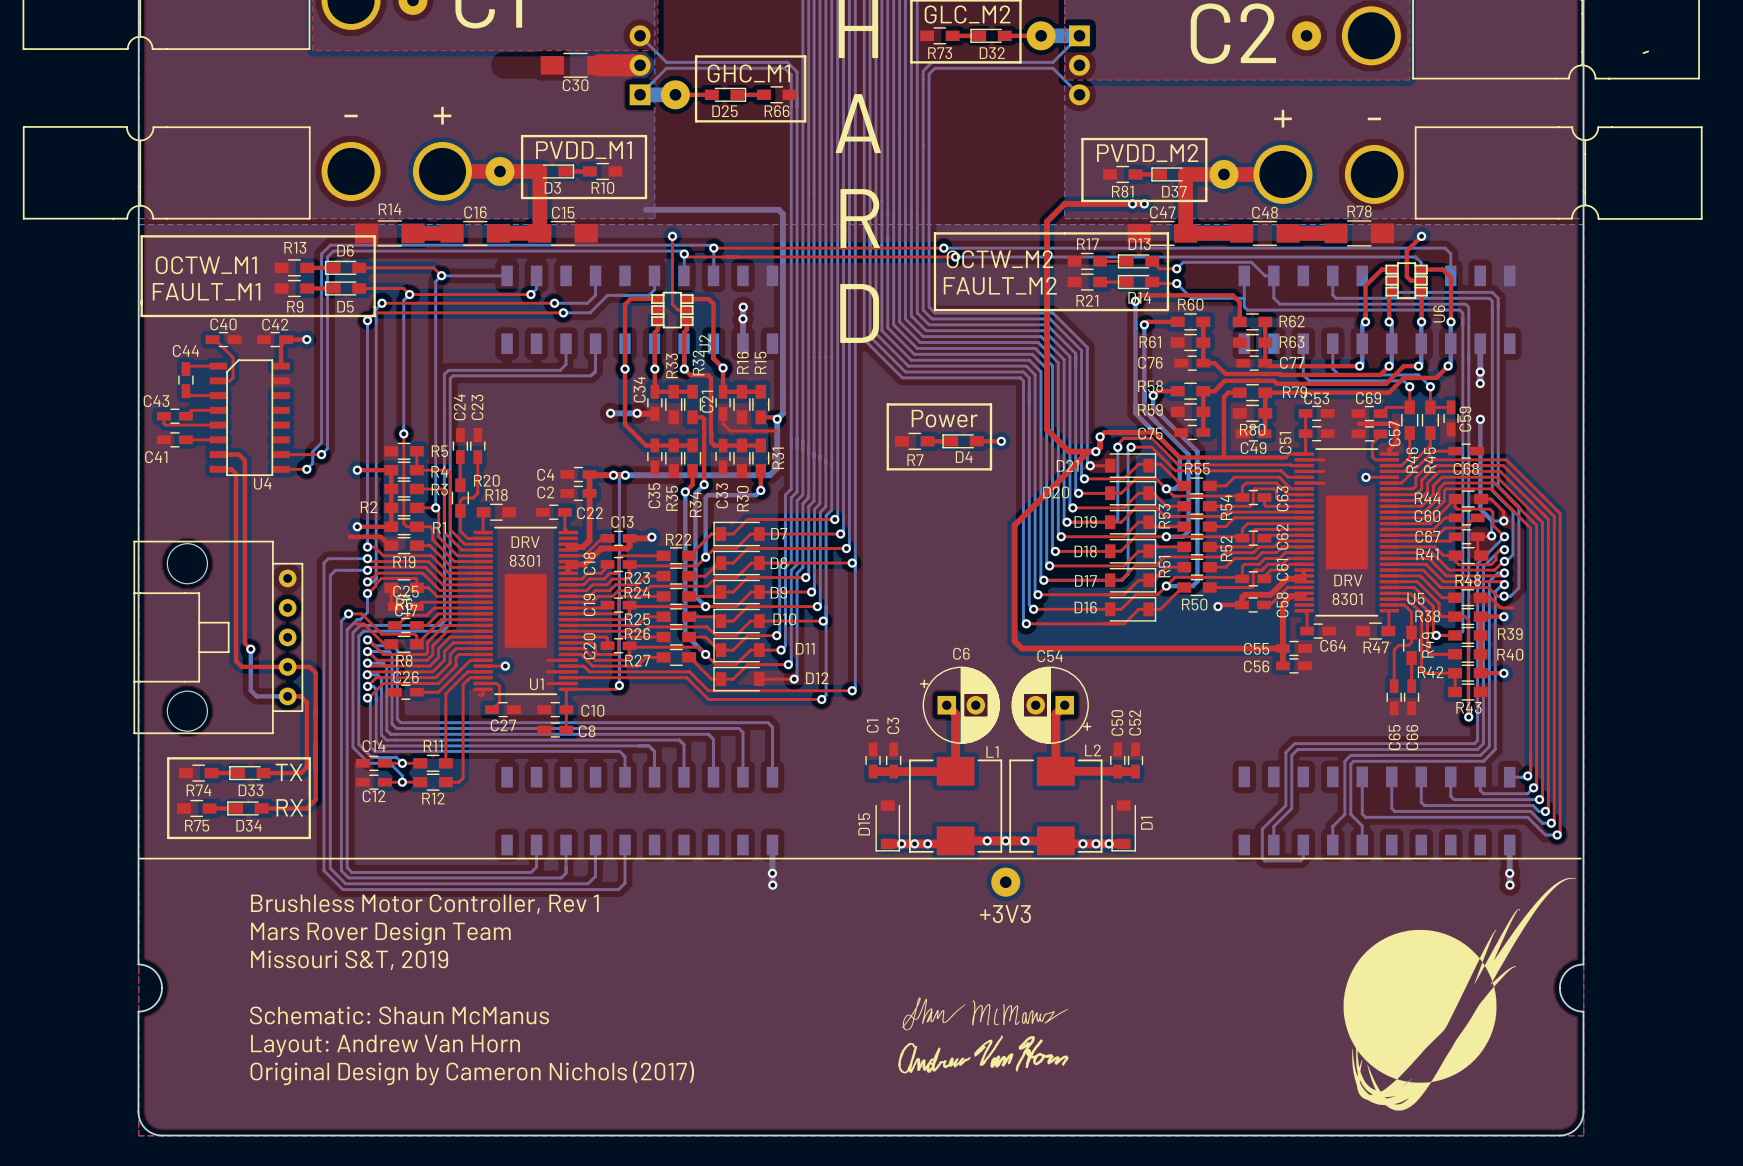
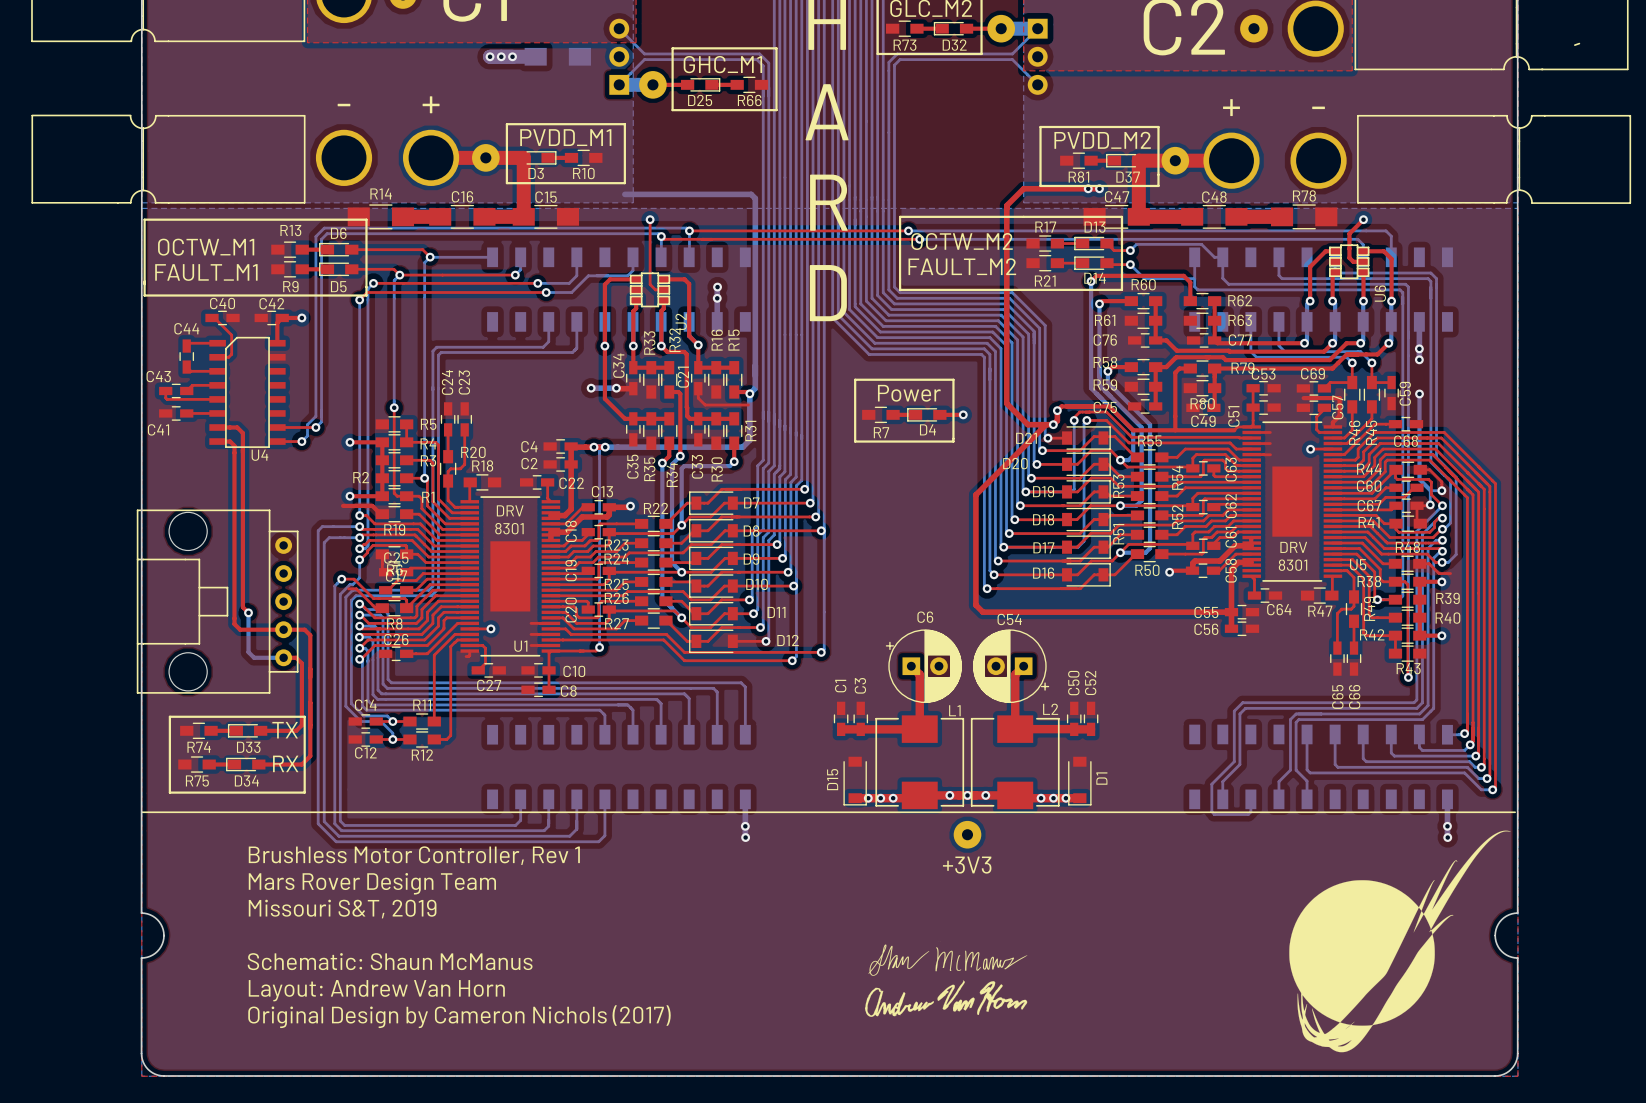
bottom track: none -> (490, 56) (535, 56)
via: none -> (490, 56)
via: none -> (501, 56)
via: none -> (512, 56)
C30 side: top (575, 65) -> bottom (557, 56)
top track: (598, 65) (640, 65) -> none

